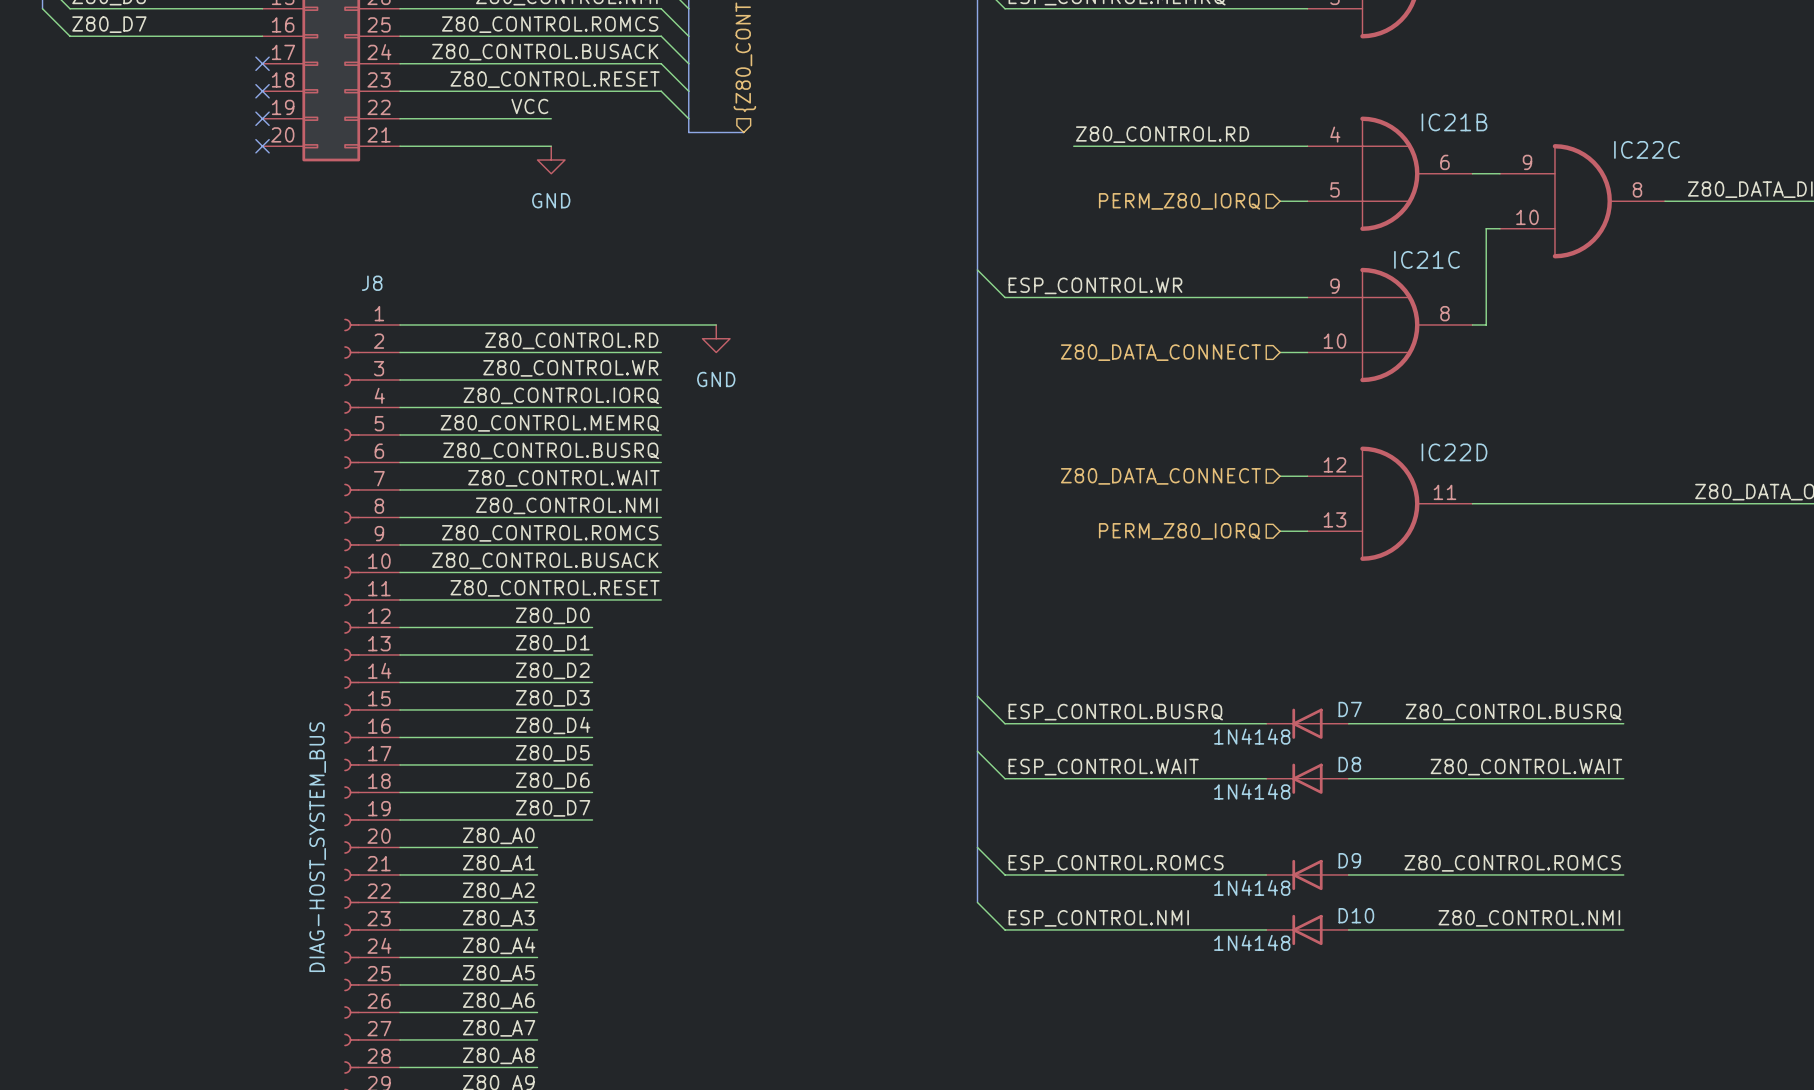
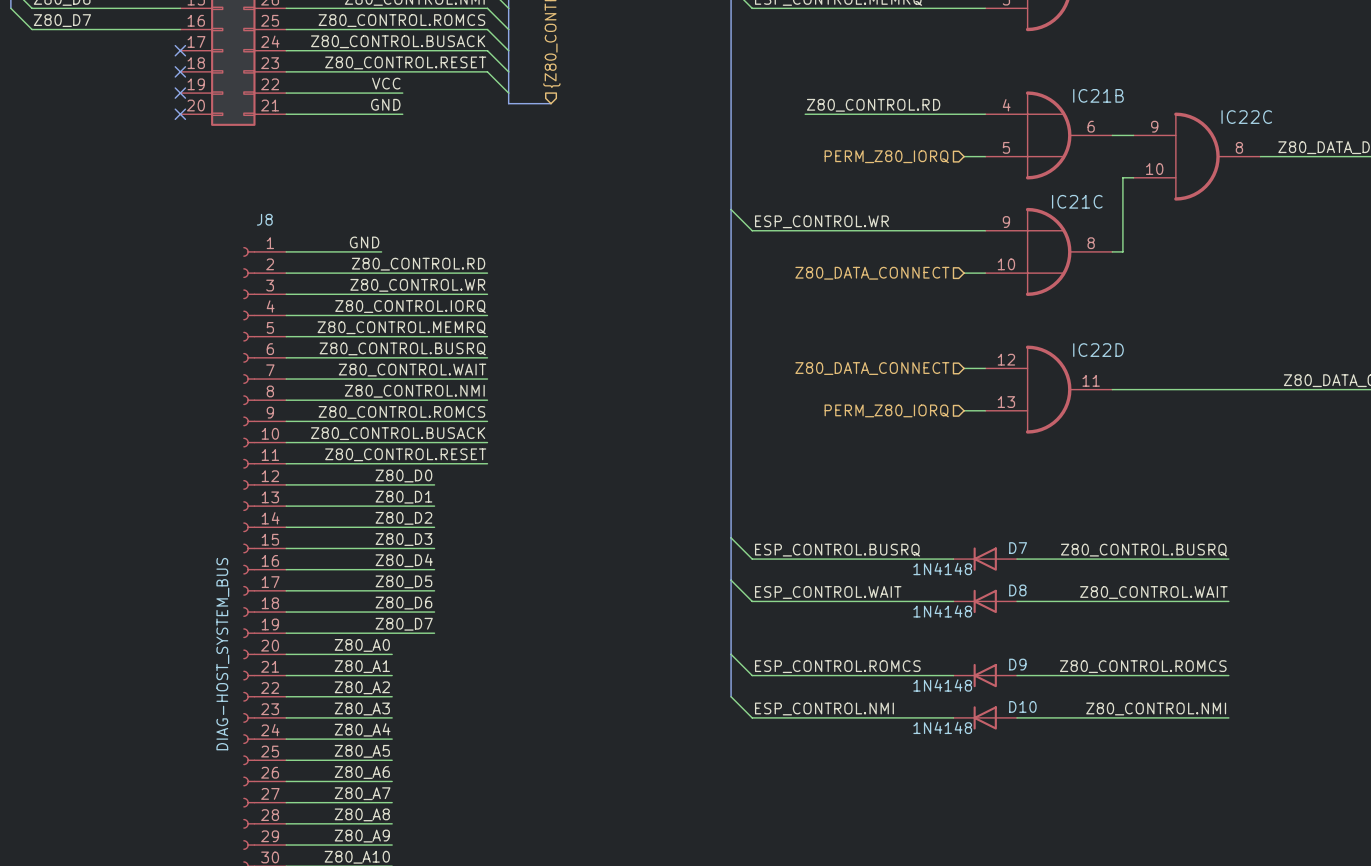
label: none -> GND (385, 104)
power symbol: GND (551, 160) -> none
label: none -> GND (364, 242)
wire: (523, 324) (716, 324) -> none
power symbol: GND (716, 338) -> none

